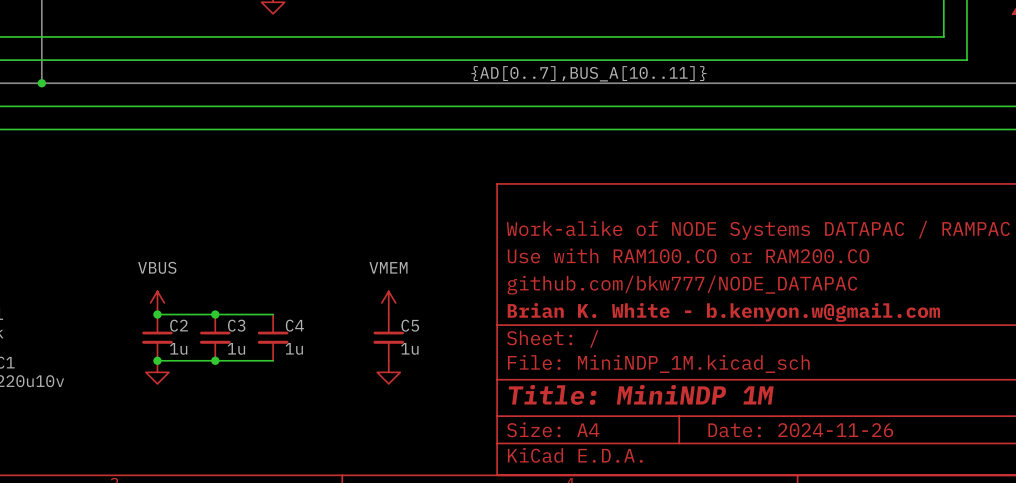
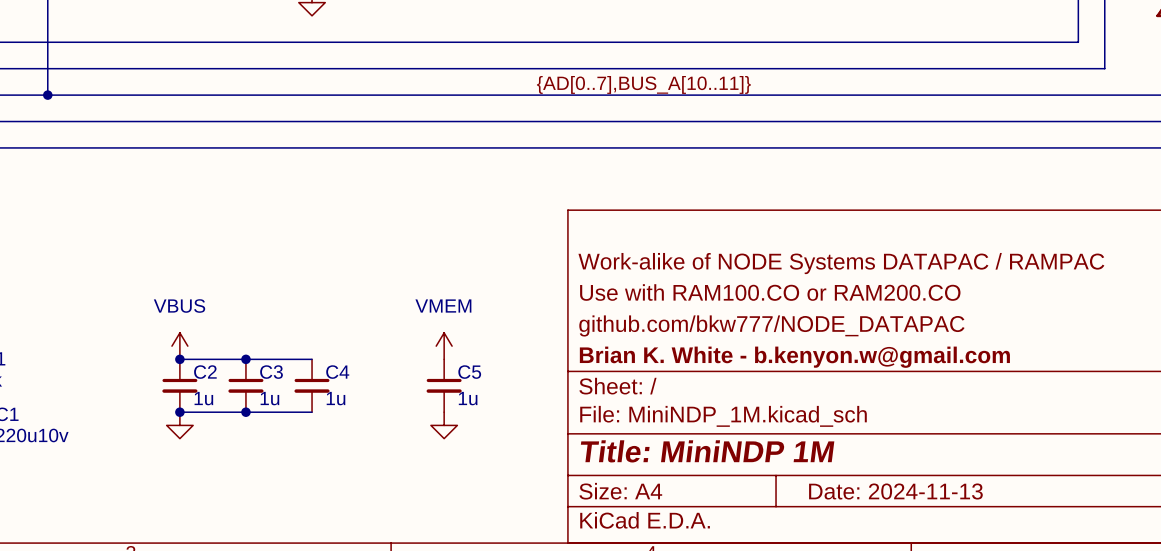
title block: Date: 2024-11-26 (800, 430) -> Date: 2024-11-13 (895, 491)

